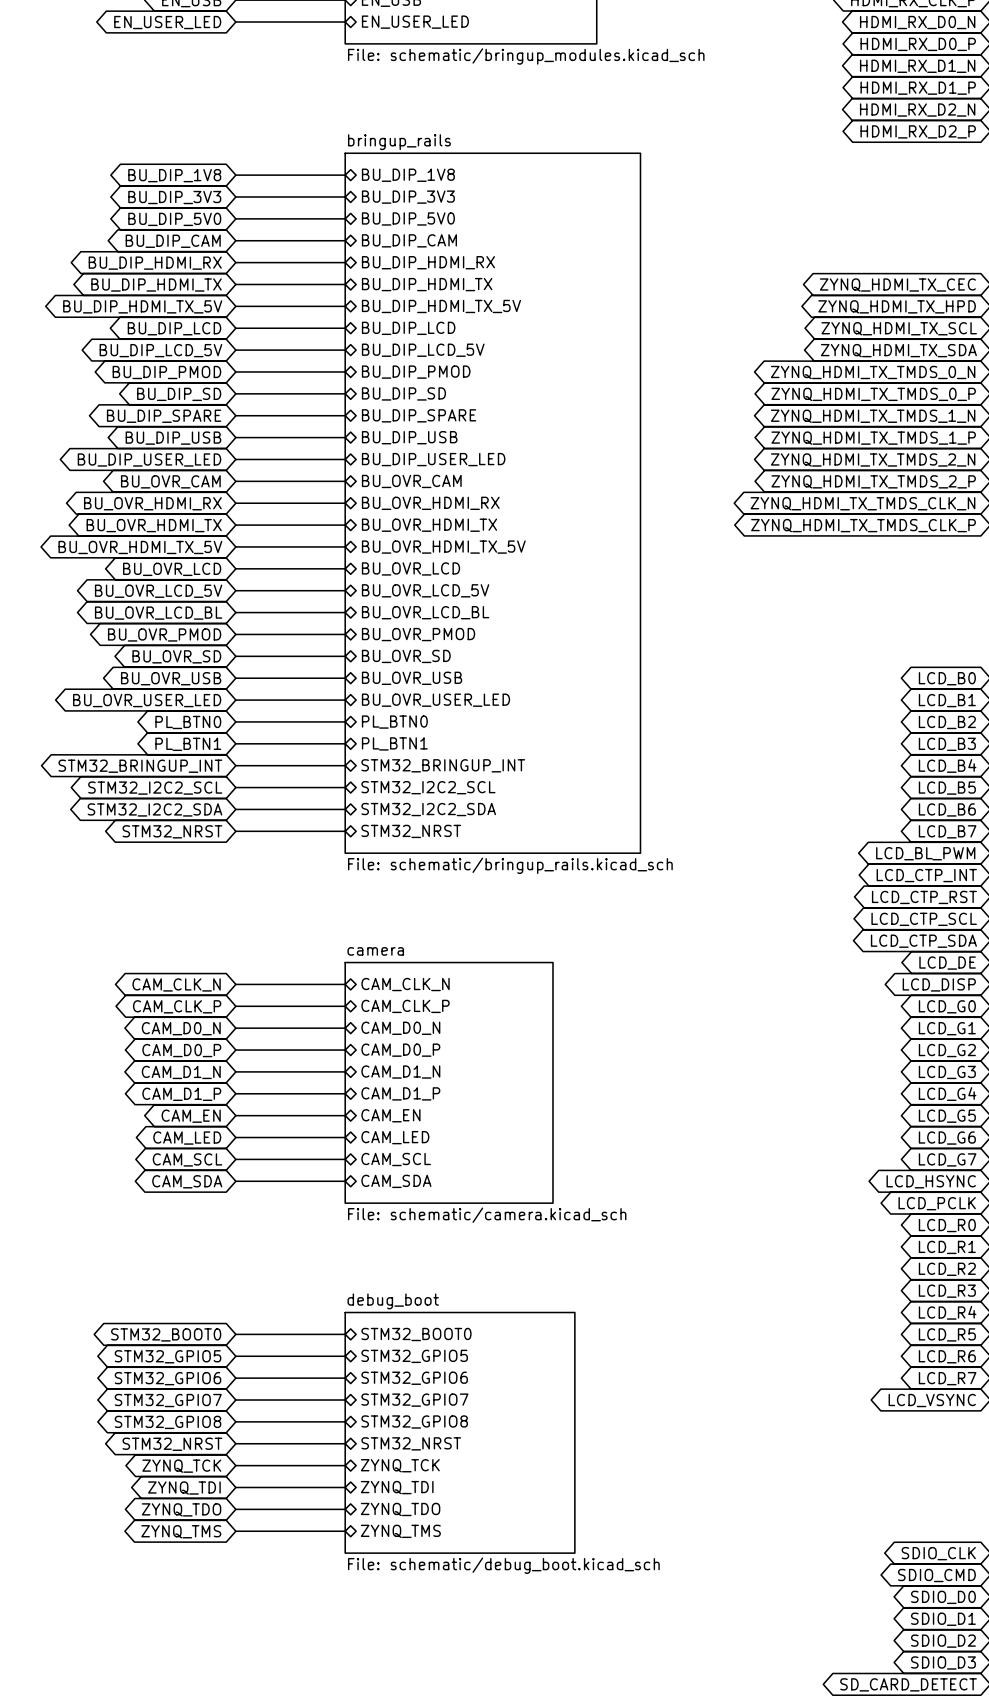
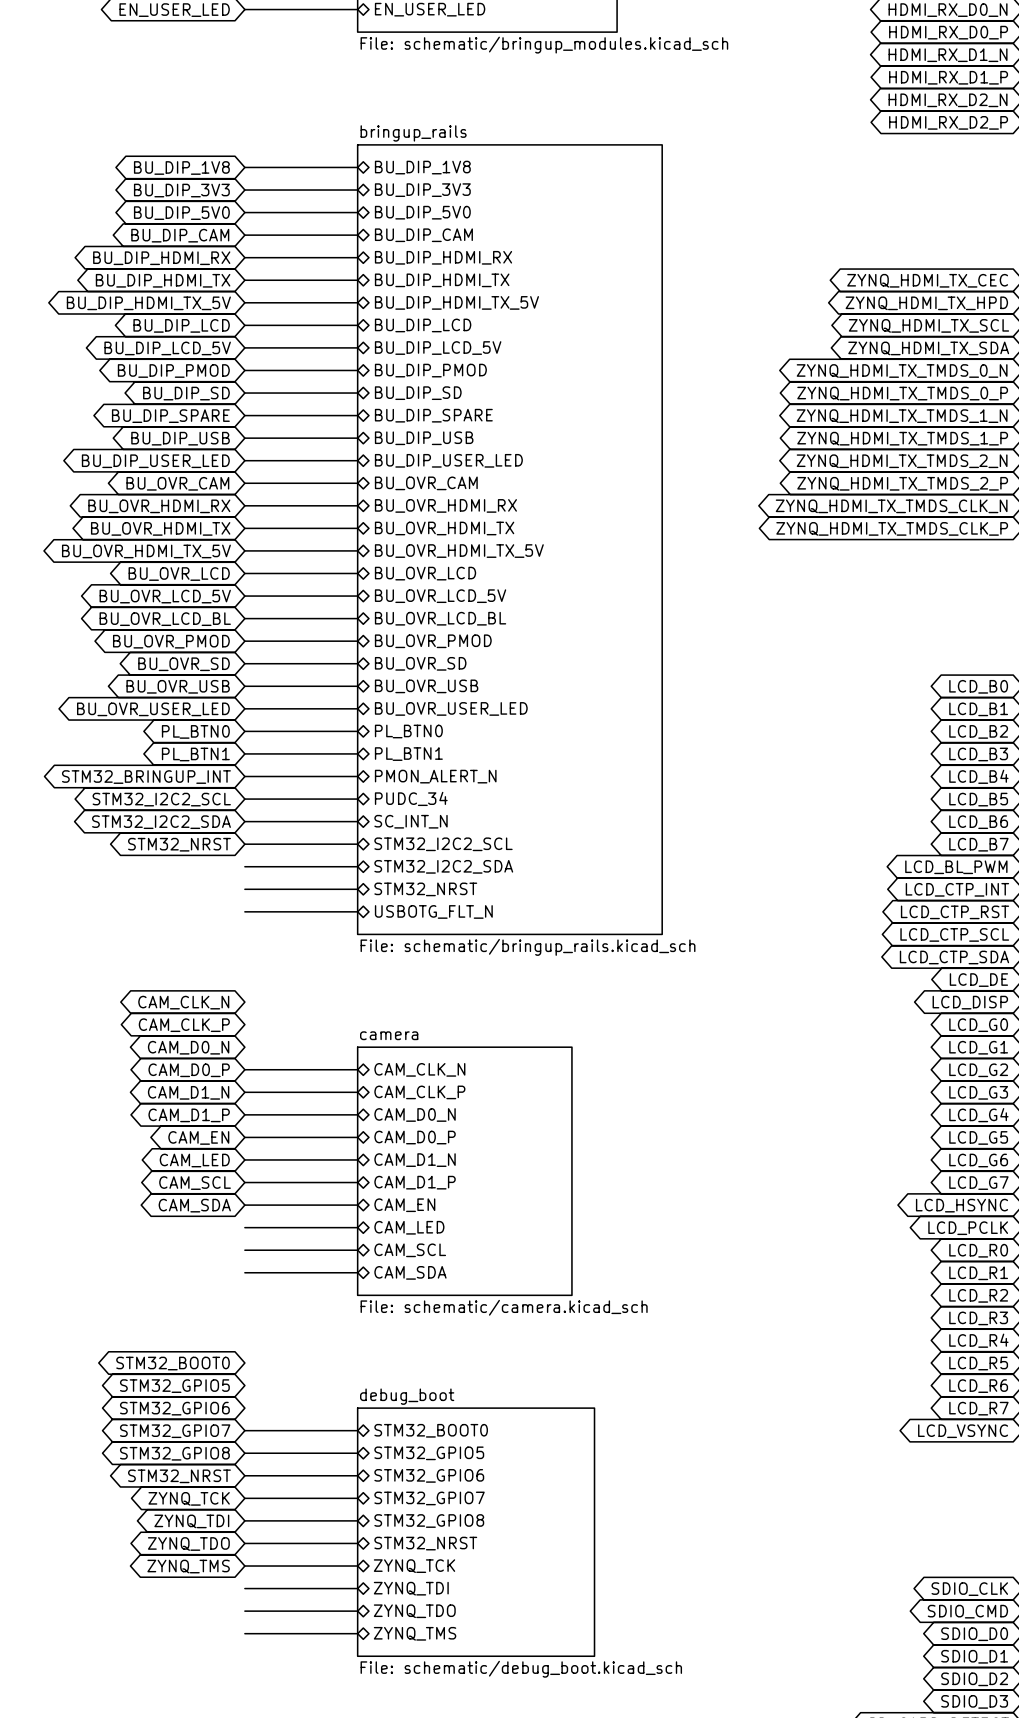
sheet bringup_rails: File: schematic/bringup_rails.kicad_sch (492, 503) -> none
sheet bringup_rails: none -> File: schematic/bringup_rails.kicad_sch (509, 539)
sheet pin: STM32_BRINGUP_INT (443, 765) -> PMON_ALERT_N (435, 776)
sheet pin: STM32_I2C2_SCL (428, 787) -> PUDC_34 (411, 798)
sheet pin: STM32_I2C2_SDA (428, 809) -> SC_INT_N (411, 821)
sheet pin: STM32_NRST (411, 831) -> STM32_I2C2_SCL (443, 844)
sheet pin: none -> STM32_I2C2_SDA (443, 866)
sheet pin: none -> STM32_NRST (425, 889)
sheet pin: none -> USBOTG_FLT_N (433, 911)
wire: (235, 984) (345, 984) -> (244, 866) (357, 866)
sheet pin: CAM_CLK_N (405, 984) -> none
wire: (235, 1006) (345, 1006) -> (244, 889) (357, 889)
sheet pin: CAM_CLK_P (405, 1006) -> none
wire: (235, 1028) (345, 1028) -> (244, 911) (357, 911)
sheet pin: CAM_D0_N (400, 1028) -> none
sheet pin: CAM_D0_P (400, 1050) -> CAM_CLK_N (419, 1069)
sheet pin: CAM_D1_N (400, 1072) -> CAM_CLK_P (419, 1092)
sheet camera position: (449, 1082) -> (464, 1171)
sheet pin: CAM_D1_P (400, 1093) -> CAM_D0_N (415, 1114)
sheet pin: CAM_EN (390, 1115) -> CAM_D0_P (415, 1137)
sheet pin: CAM_LED (395, 1137) -> CAM_D1_N (415, 1160)
sheet pin: CAM_SCL (396, 1159) -> CAM_D1_P (415, 1182)
sheet pin: CAM_SDA (396, 1181) -> CAM_EN (404, 1205)
sheet pin: none -> CAM_LED (409, 1227)
sheet pin: none -> CAM_SCL (410, 1250)
sheet pin: none -> CAM_SDA (410, 1272)
wire: (235, 1334) (345, 1334) -> (244, 1227) (357, 1227)
sheet pin: STM32_BOOT0 (416, 1334) -> none
wire: (235, 1356) (345, 1356) -> (244, 1250) (357, 1250)
sheet pin: STM32_GPIO5 (414, 1356) -> none
wire: (235, 1378) (345, 1378) -> (244, 1272) (357, 1272)
sheet pin: STM32_GPIO6 (414, 1378) -> none
sheet pin: STM32_GPIO7 (414, 1400) -> STM32_BOOT0 (431, 1430)
sheet pin: STM32_GPIO8 (414, 1421) -> STM32_GPIO5 (429, 1453)
sheet debug_boot position: (460, 1432) -> (476, 1532)
sheet pin: STM32_NRST (411, 1443) -> STM32_GPIO6 (429, 1475)
sheet pin: ZYNQ_TCK (400, 1465) -> STM32_GPIO7 (429, 1498)
sheet pin: ZYNQ_TDI (397, 1487) -> STM32_GPIO8 (429, 1521)
sheet pin: ZYNQ_TDO (400, 1509) -> STM32_NRST (425, 1543)
sheet pin: ZYNQ_TMS (400, 1531) -> ZYNQ_TCK (414, 1566)
wire: none -> (244, 1588) (357, 1588)
sheet pin: none -> ZYNQ_TDI (411, 1588)
wire: none -> (244, 1611) (357, 1611)
sheet pin: none -> ZYNQ_TDO (414, 1611)
wire: none -> (244, 1633) (357, 1633)
sheet pin: none -> ZYNQ_TMS (415, 1633)

